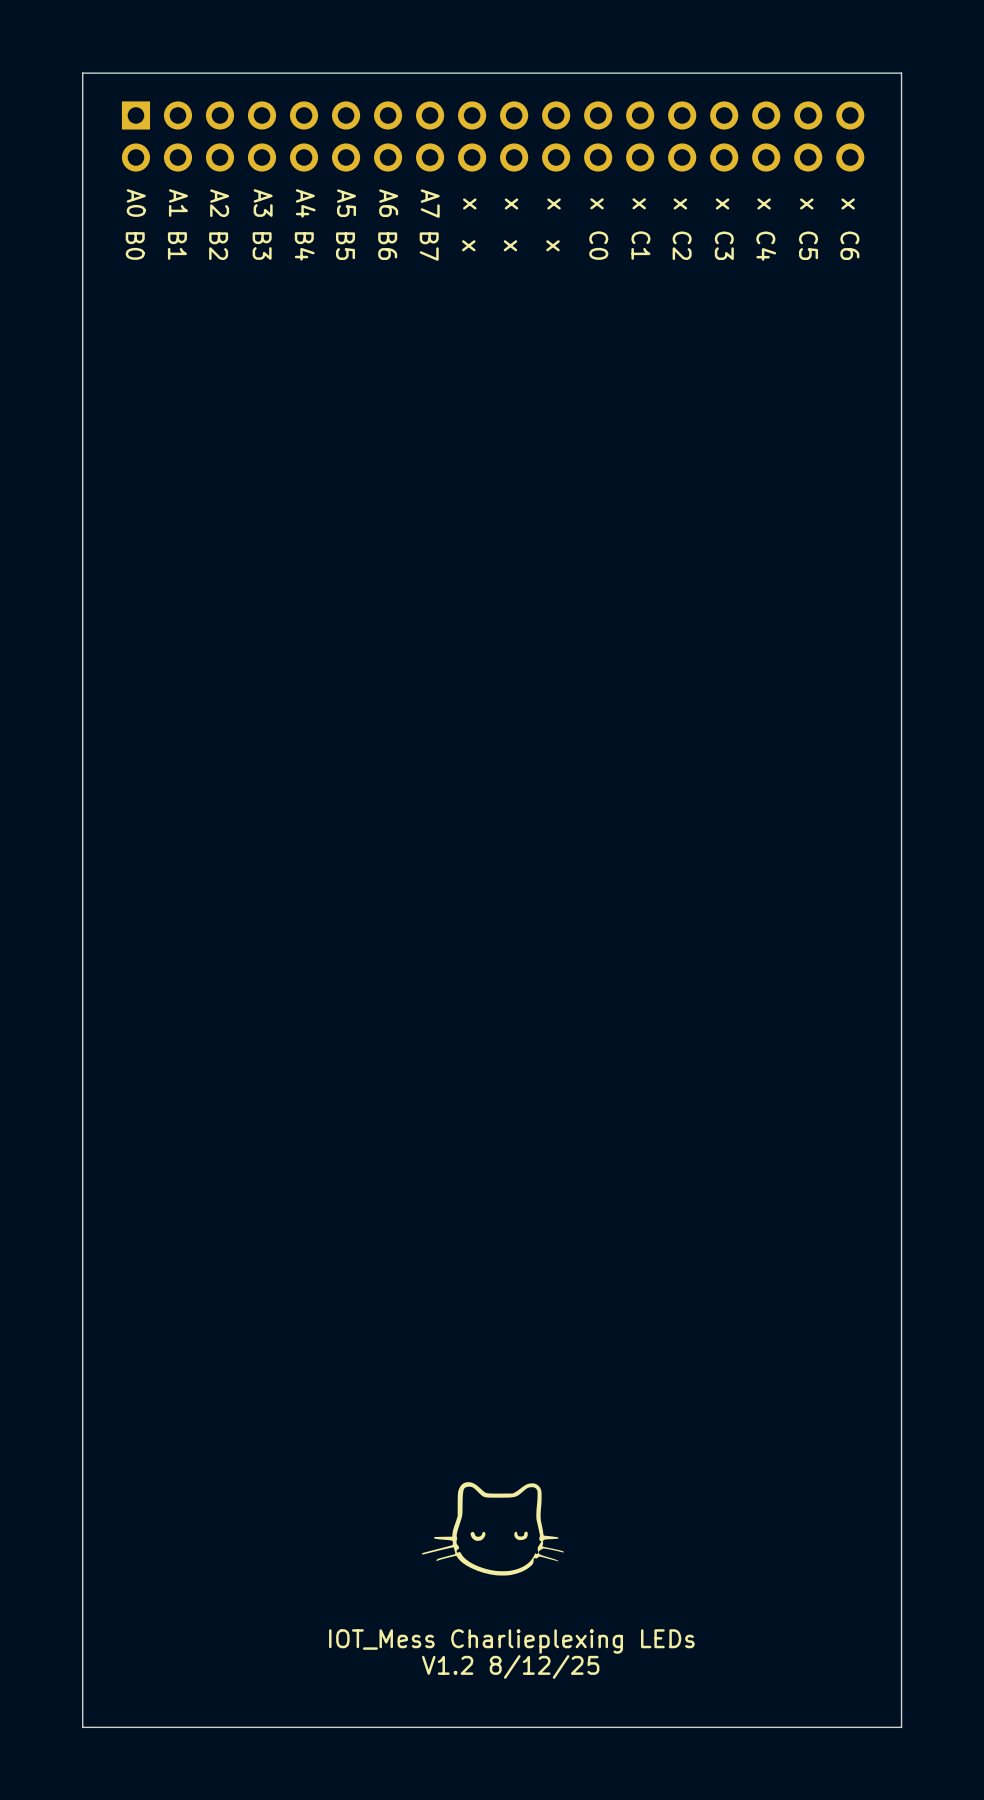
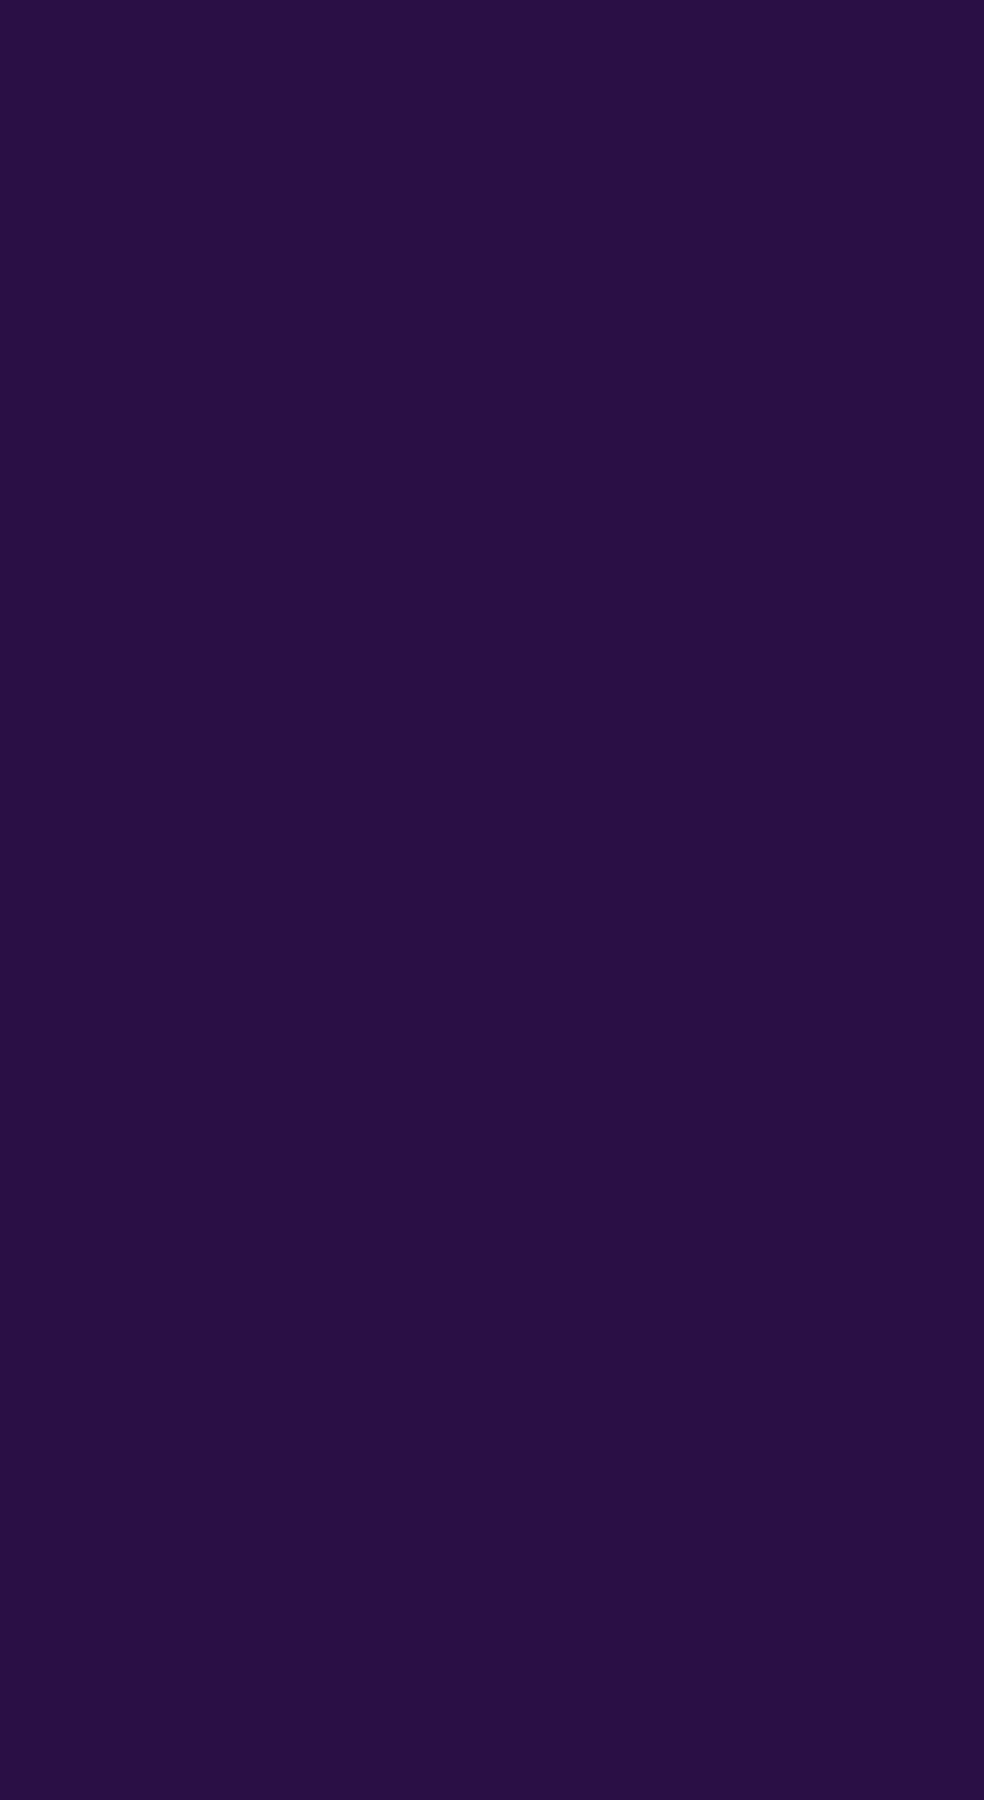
board edge: (901, 73) (82, 73) (82, 1727) (901, 1727) (901, 73) -> none
part: (493, 136) -> none
text: A0 (136, 203) -> none
text: A1 (178, 203) -> none
text: A2 (219, 203) -> none
text: A3 (263, 203) -> none
text: A4 (305, 203) -> none
text: A5 (346, 203) -> none
text: A6 (388, 203) -> none
text: A7 (430, 203) -> none
text: x (469, 203) -> none
text: x (511, 203) -> none
text: x (554, 203) -> none
text: x (597, 203) -> none
text: x (639, 203) -> none
text: x (680, 203) -> none
text: x (722, 203) -> none
text: x (764, 203) -> none
text: x (806, 203) -> none
text: x (848, 203) -> none
text: x (468, 245) -> none
text: x (510, 245) -> none
text: x (552, 245) -> none
text: C0 (598, 245) -> none
text: C1 (640, 245) -> none
text: C2 (682, 245) -> none
text: C3 (724, 245) -> none
text: C5 (808, 245) -> none
text: C6 (849, 245) -> none
text: B0 (135, 246) -> none
text: B1 (177, 246) -> none
text: B2 (218, 246) -> none
text: B3 (262, 246) -> none
text: B4 (304, 246) -> none
text: B5 (345, 246) -> none
text: B6 (387, 246) -> none
text: B7 (429, 246) -> none
text: C4 (766, 246) -> none
drawing: [421, 1482, 564, 1576] -> none
text: IOT_Mess Charlieplexing LEDs (511, 1641) -> none
text: V1.2 8/12/25 (510, 1666) -> none

